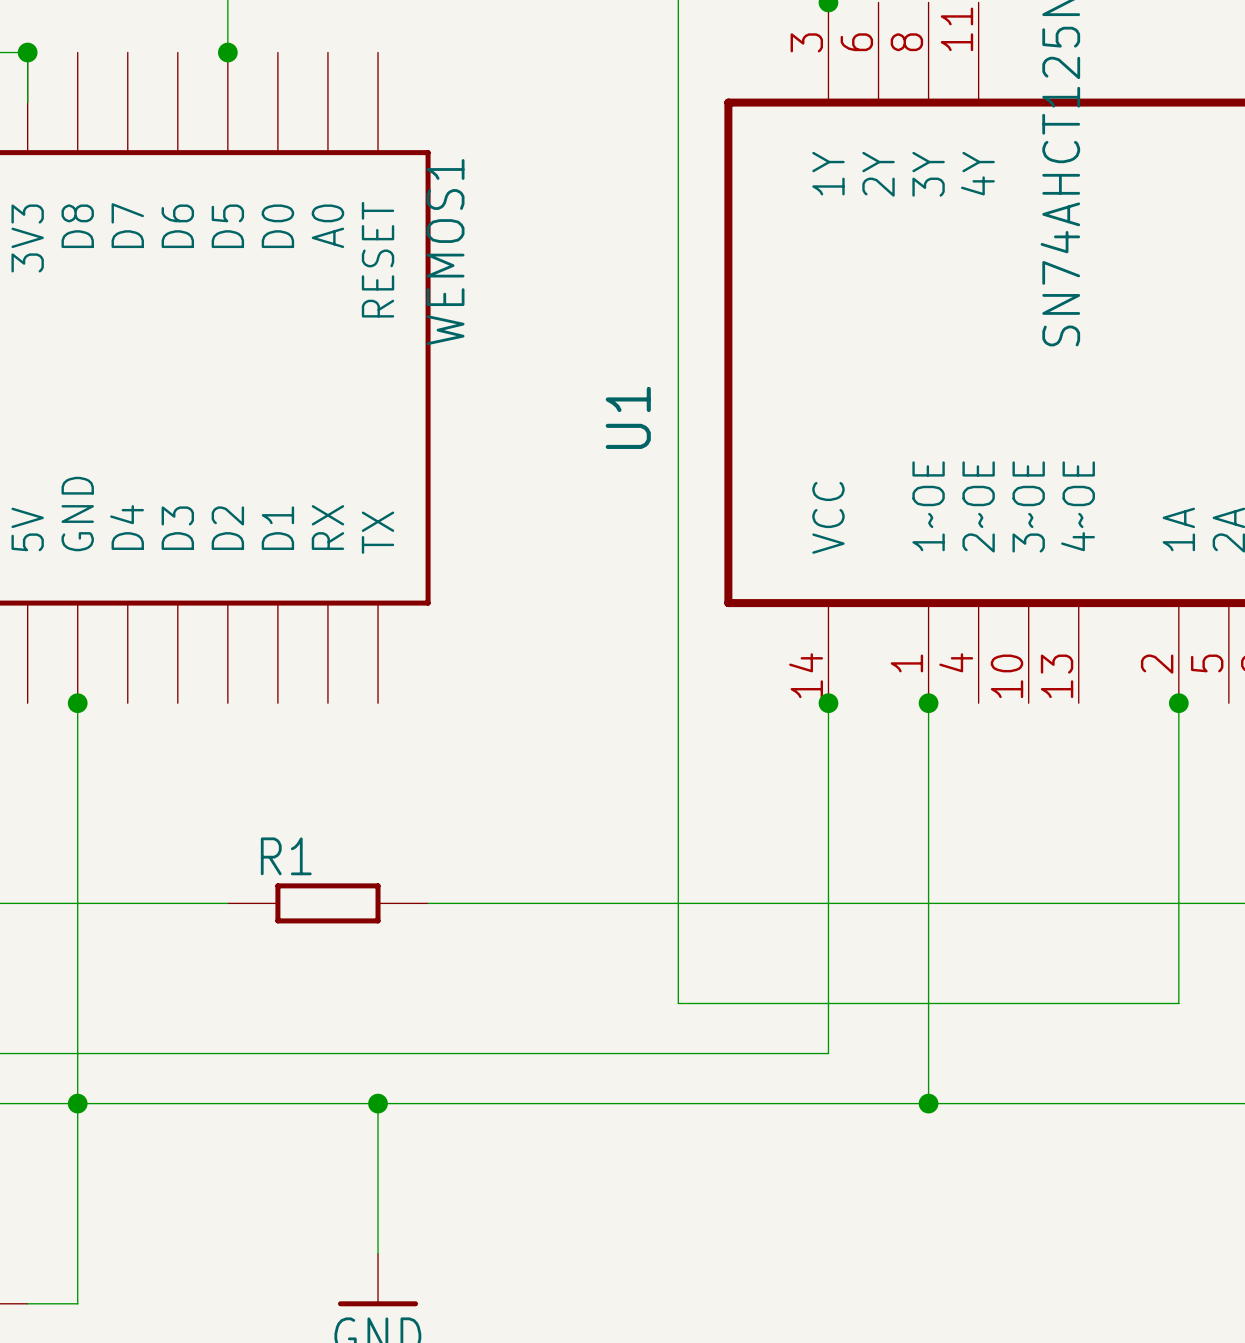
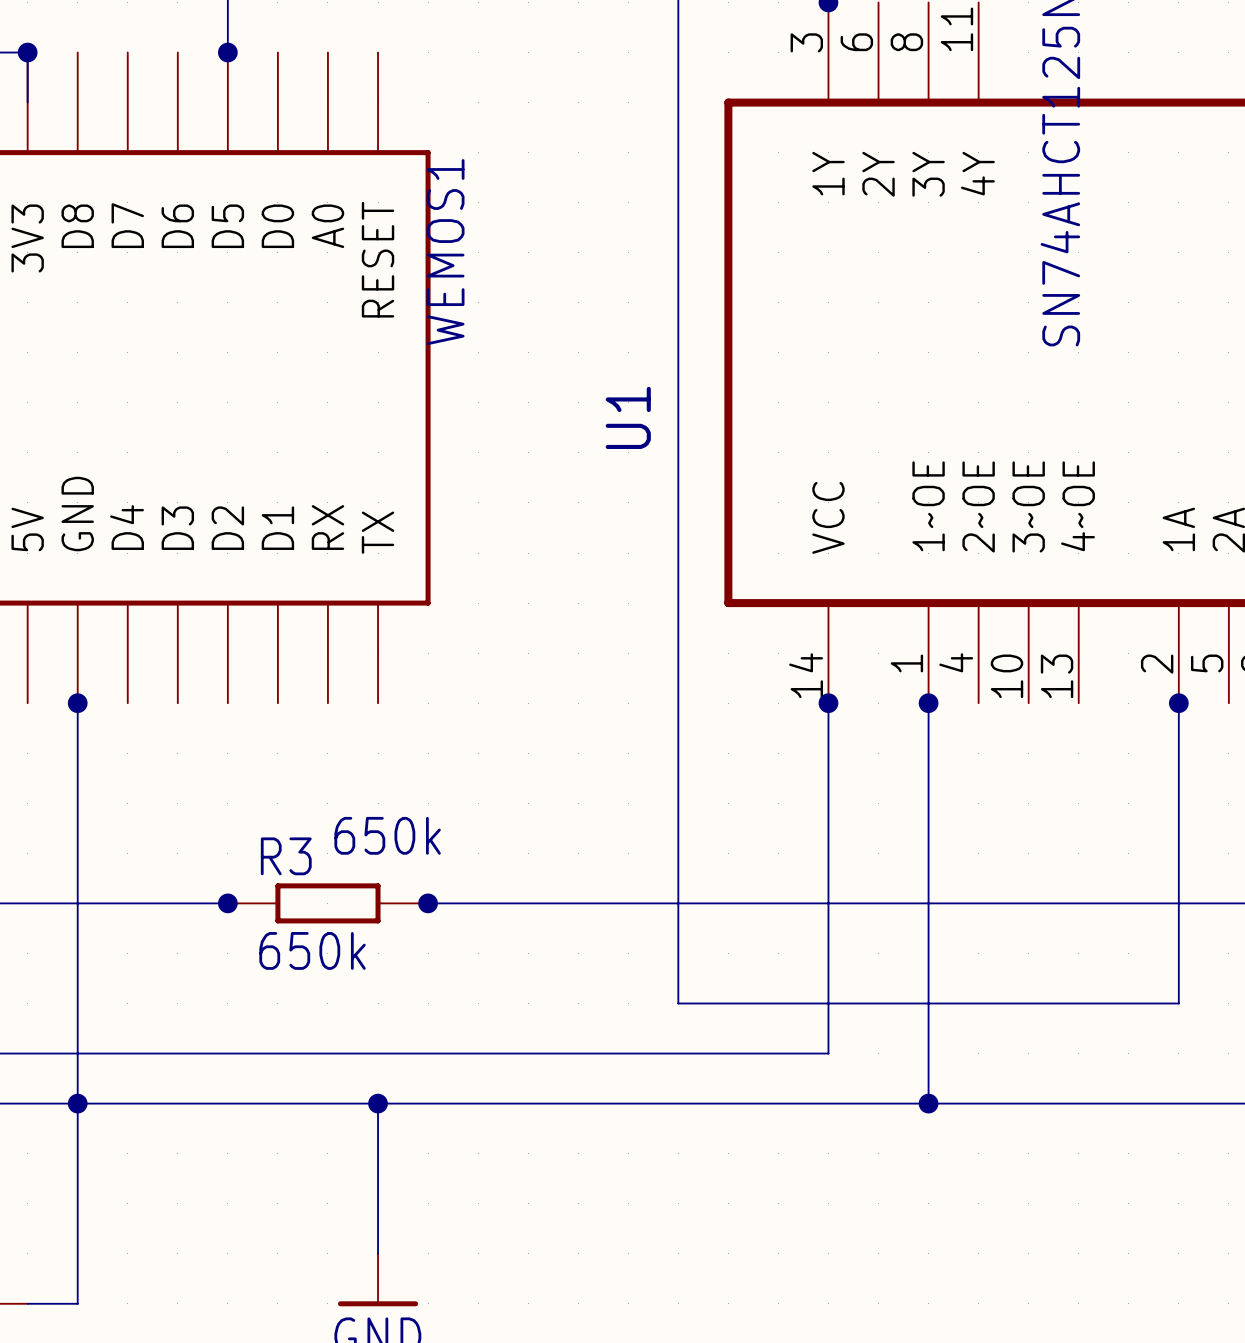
R1 text: none -> 650k (387, 835)
R1 name: R1 (286, 856) -> R3 (286, 856)
junction: none -> (227, 903)
junction: none -> (428, 903)
R1 value: none -> 650k (312, 950)

